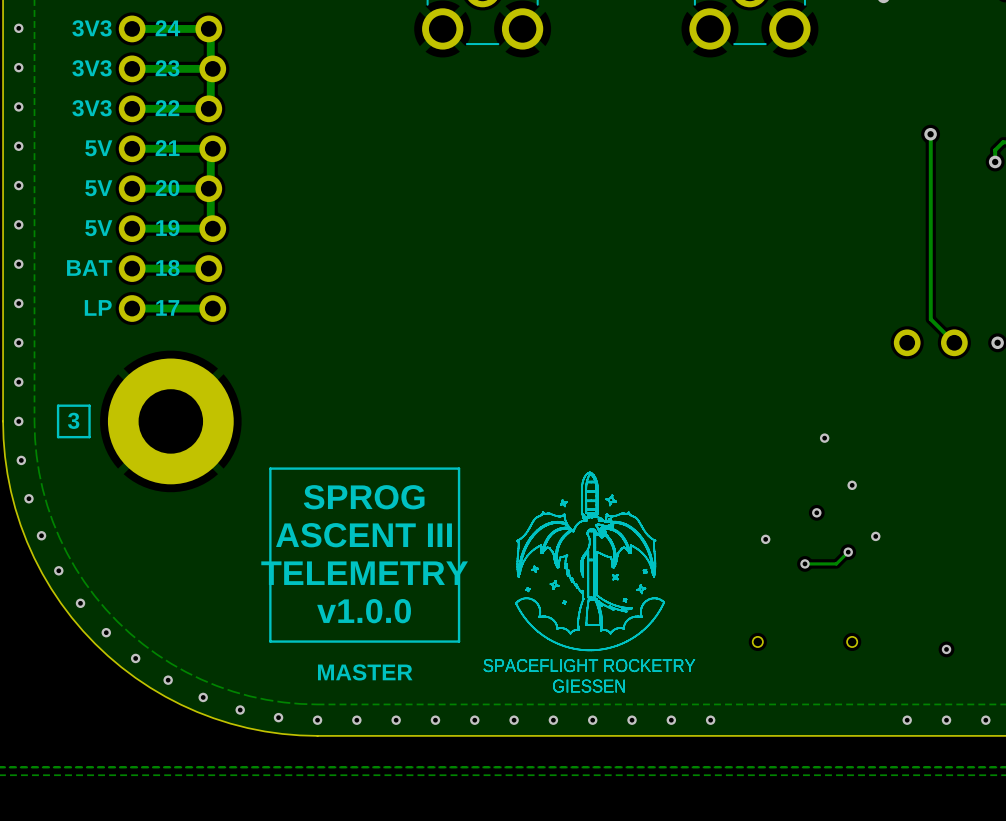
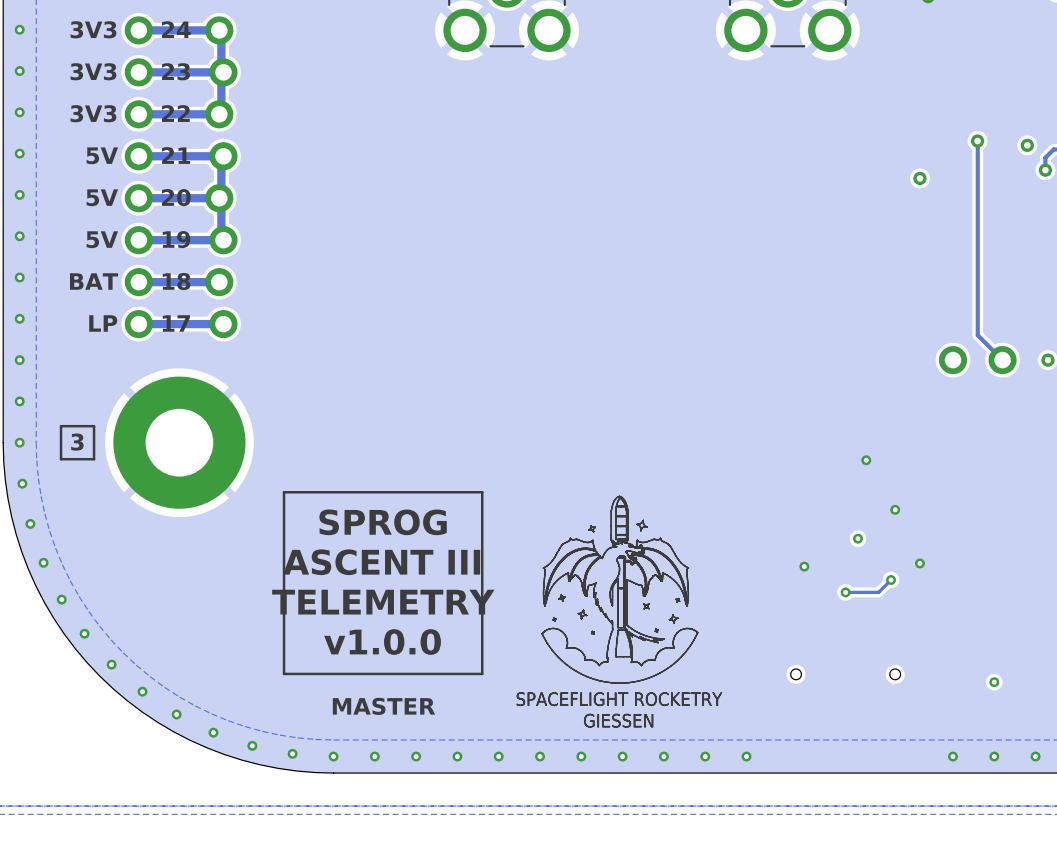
via: none -> (1027, 145)
via: none -> (919, 178)

